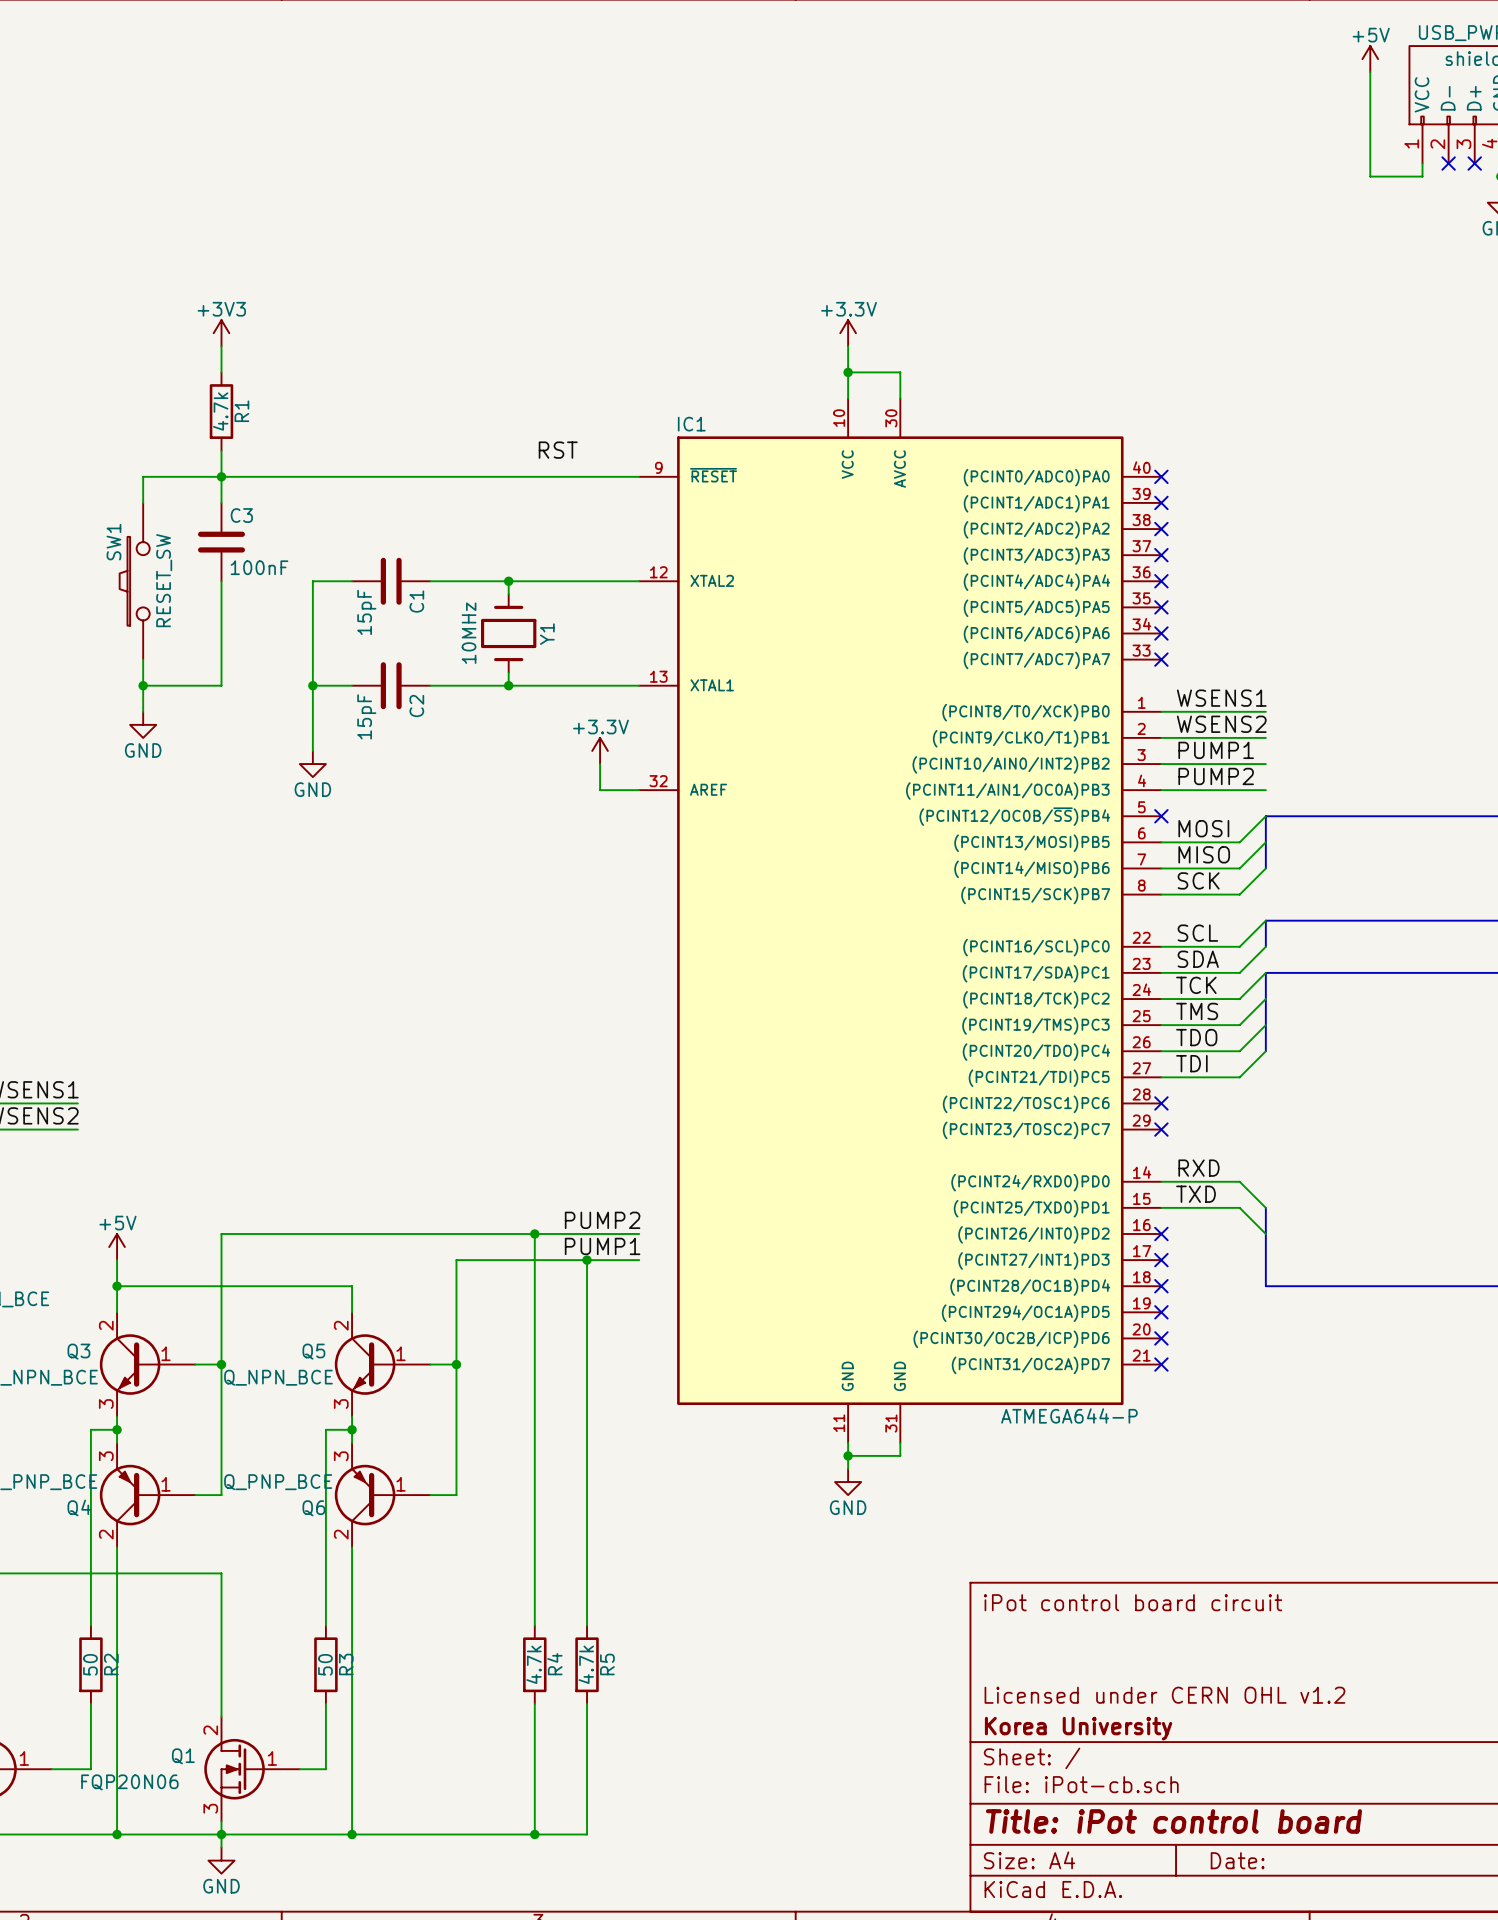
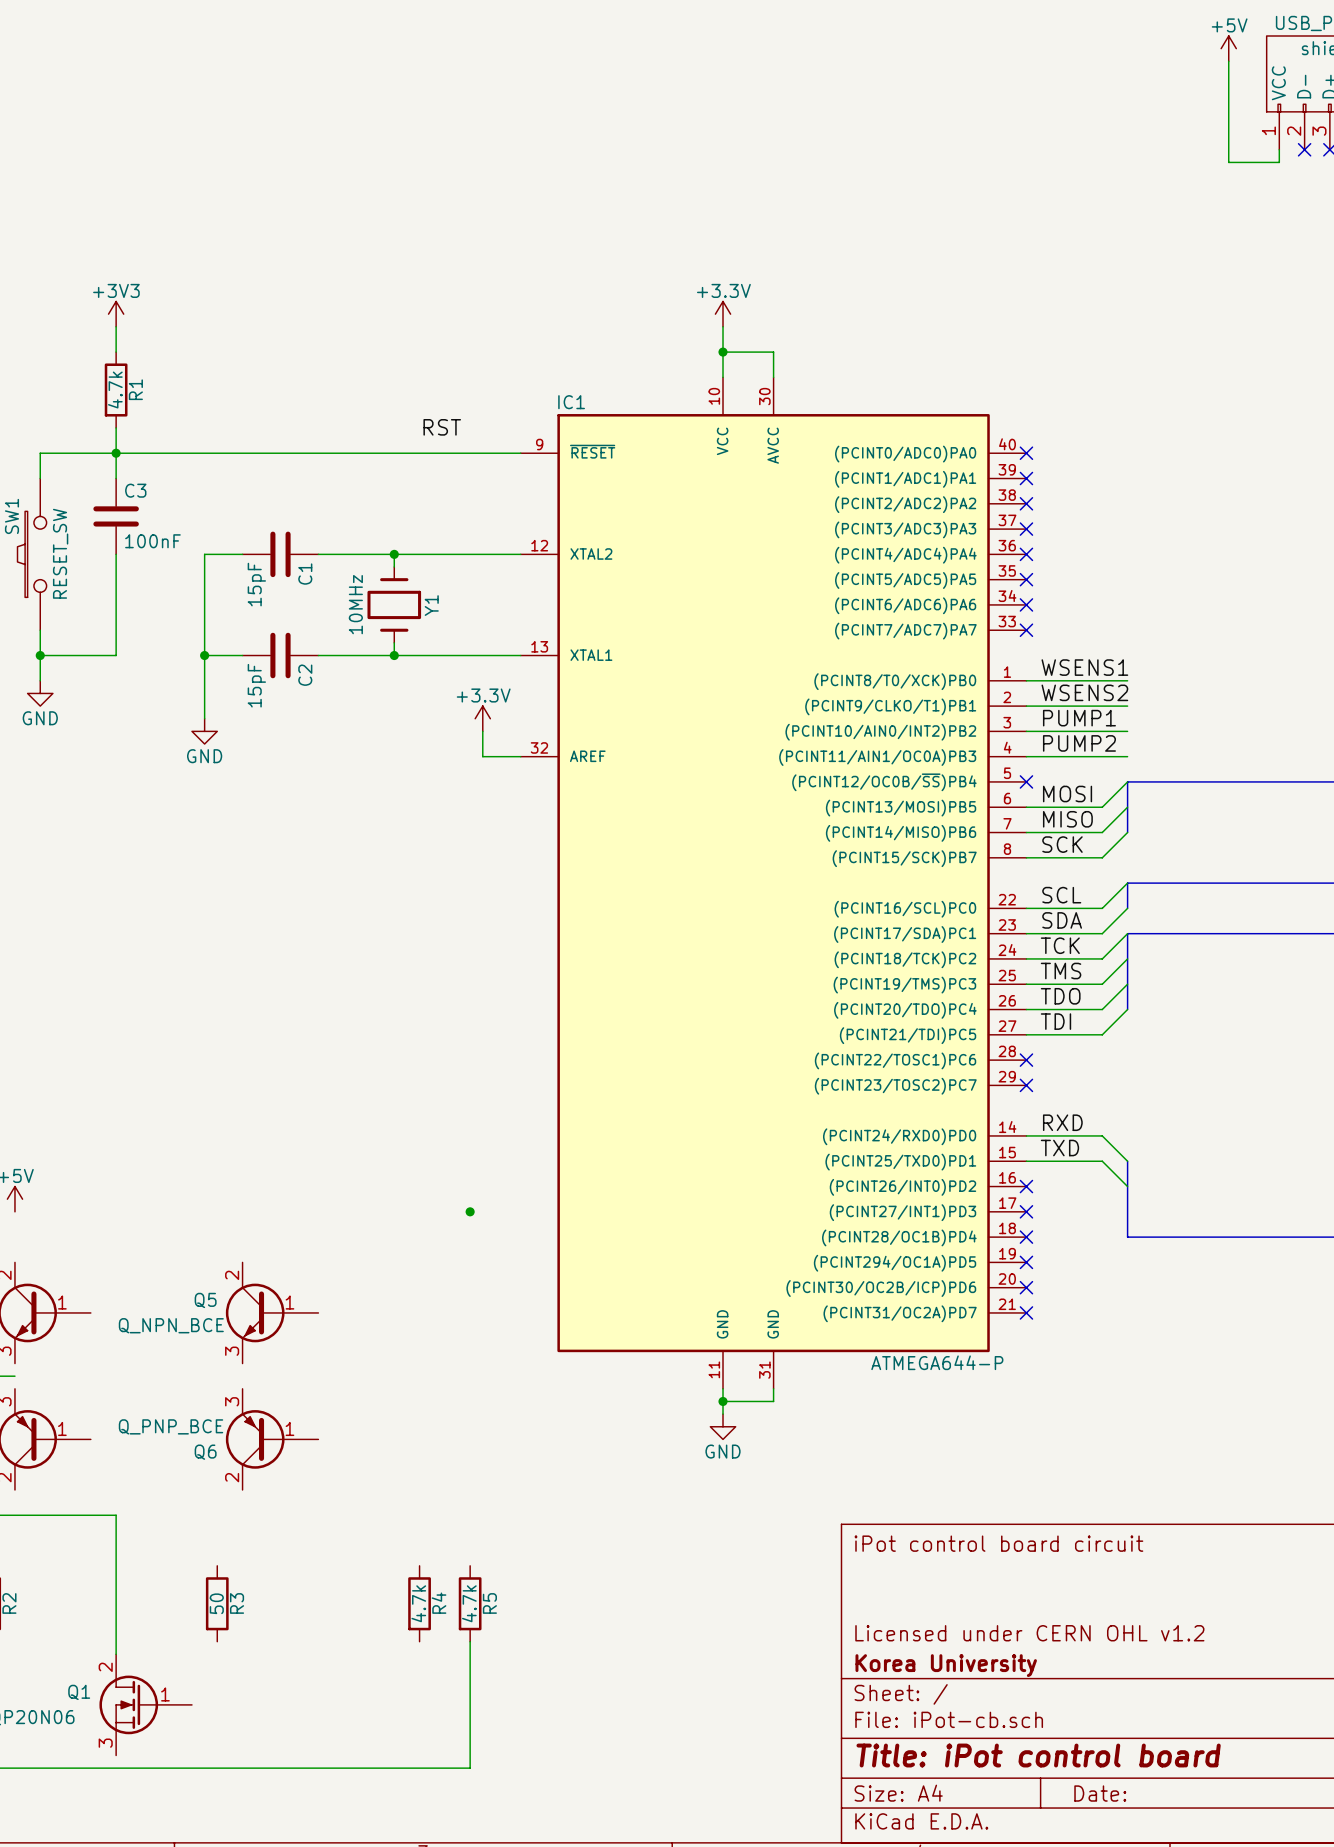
label: PUMP2 (602, 1220) -> none
wire: (534, 1233) (534, 1625) -> none
junction: (534, 1233) -> none
wire: (639, 1233) (221, 1233) (221, 1495) (195, 1495) -> none
label: PUMP1 (602, 1246) -> none
wire: (117, 1260) (117, 1312) -> none
wire: (587, 1260) (587, 1625) -> none
wire: (639, 1260) (456, 1260) (456, 1495) (430, 1495) -> none
wire: (117, 1286) (352, 1286) (352, 1312) -> none
junction: (117, 1286) -> none
wire: (195, 1364) (221, 1364) -> none
junction: (221, 1364) -> none
wire: (430, 1364) (456, 1364) -> none
junction: (456, 1364) -> none
wire: (117, 1416) (117, 1442) -> none
wire: (352, 1416) (352, 1442) -> none
junction: (117, 1429) -> none
wire: (352, 1429) (325, 1429) (325, 1625) -> none
junction: (352, 1429) -> none
wire: (117, 1547) (117, 1834) -> none
wire: (352, 1547) (352, 1834) -> none
wire: (325, 1703) (325, 1769) (299, 1769) -> none
wire: (534, 1703) (534, 1834) -> none
wire: (221, 1821) (221, 1847) -> none
junction: (117, 1834) -> none
junction: (221, 1834) -> none
junction: (352, 1834) -> none
junction: (534, 1834) -> none
power symbol: GND (221, 1860) -> none

